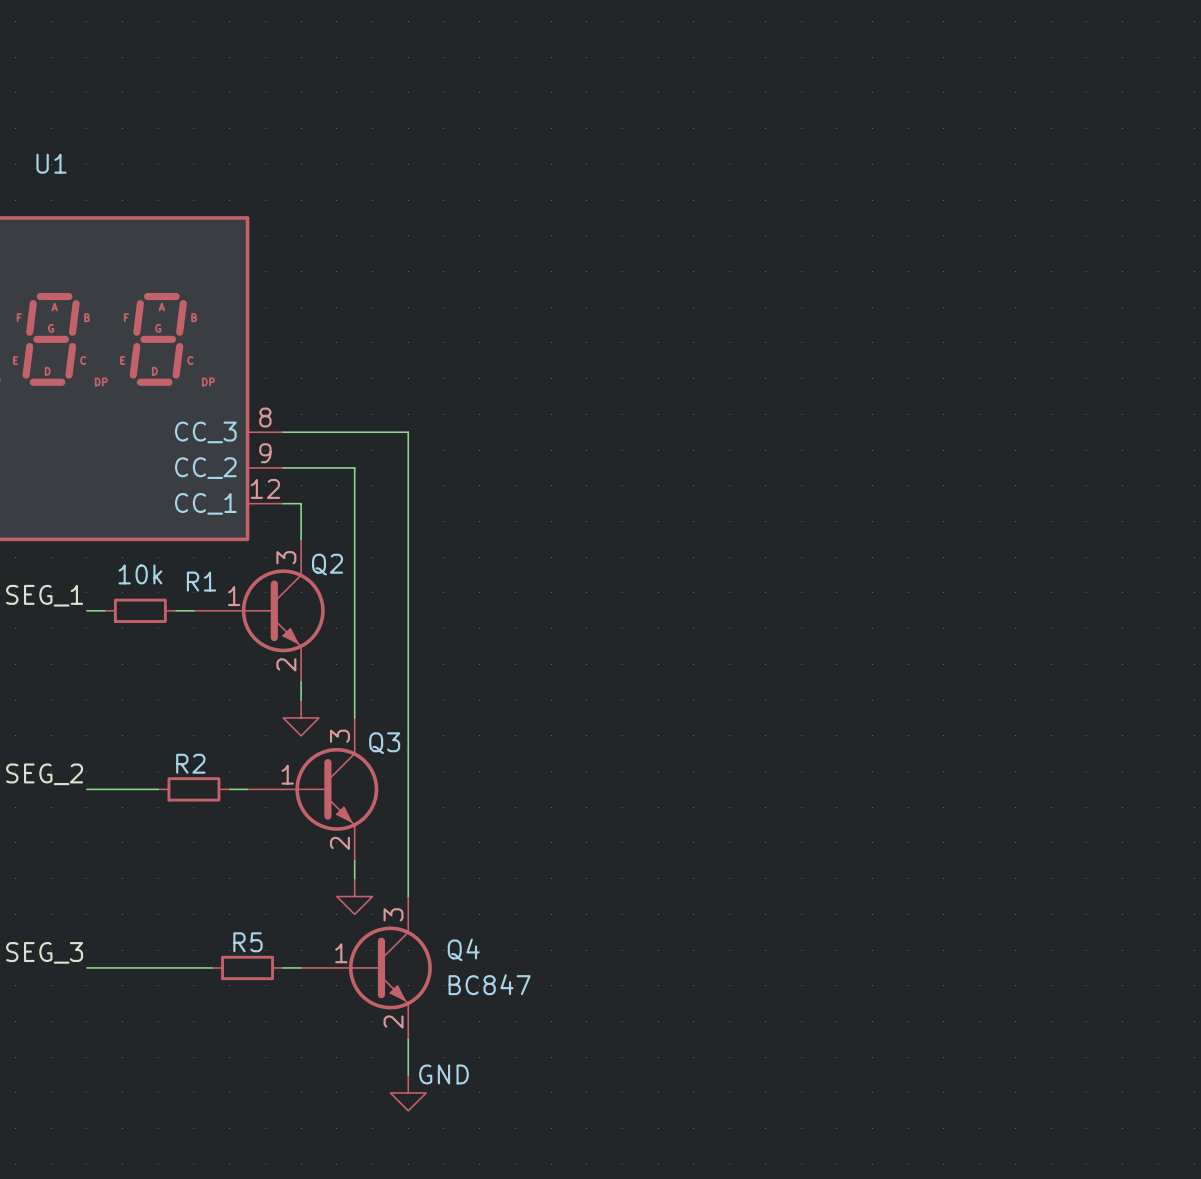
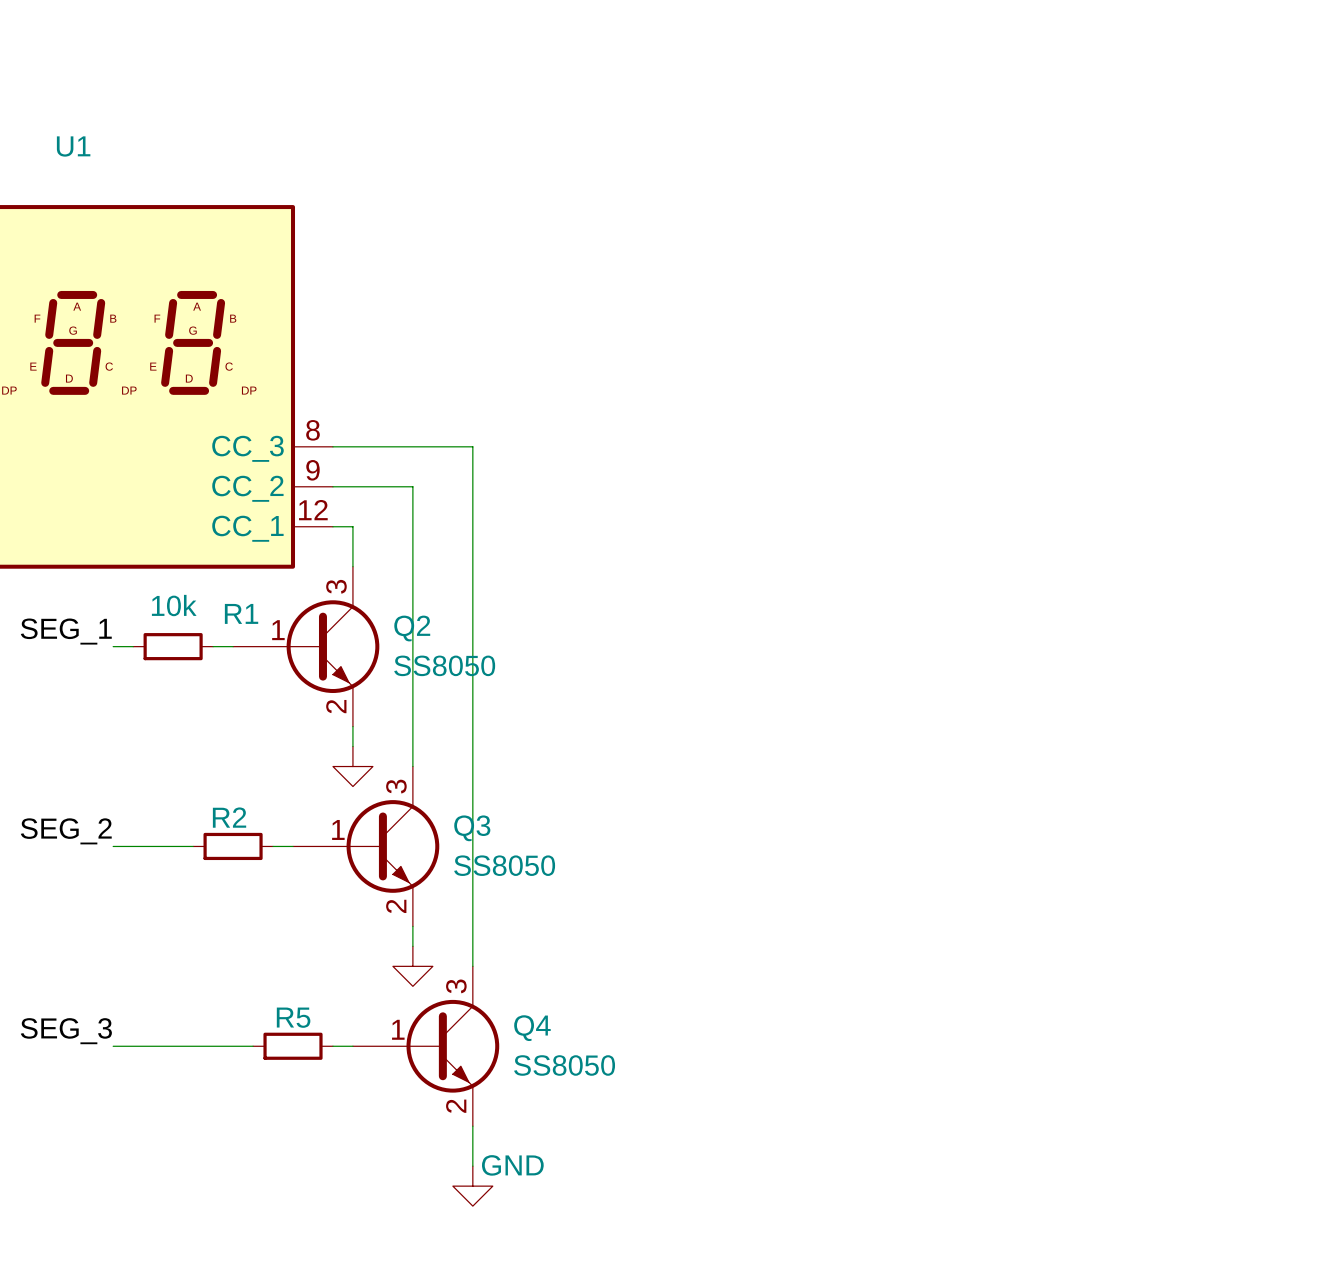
Q2 name position: Q2 (327, 564) -> Q2 (412, 628)
Q2 value: none -> SS8050 (444, 665)
Q3 name position: Q3 (384, 743) -> Q3 (472, 828)
Q3 value: none -> SS8050 (504, 865)
Q4 value: BC847 (489, 984) -> SS8050 (564, 1065)

